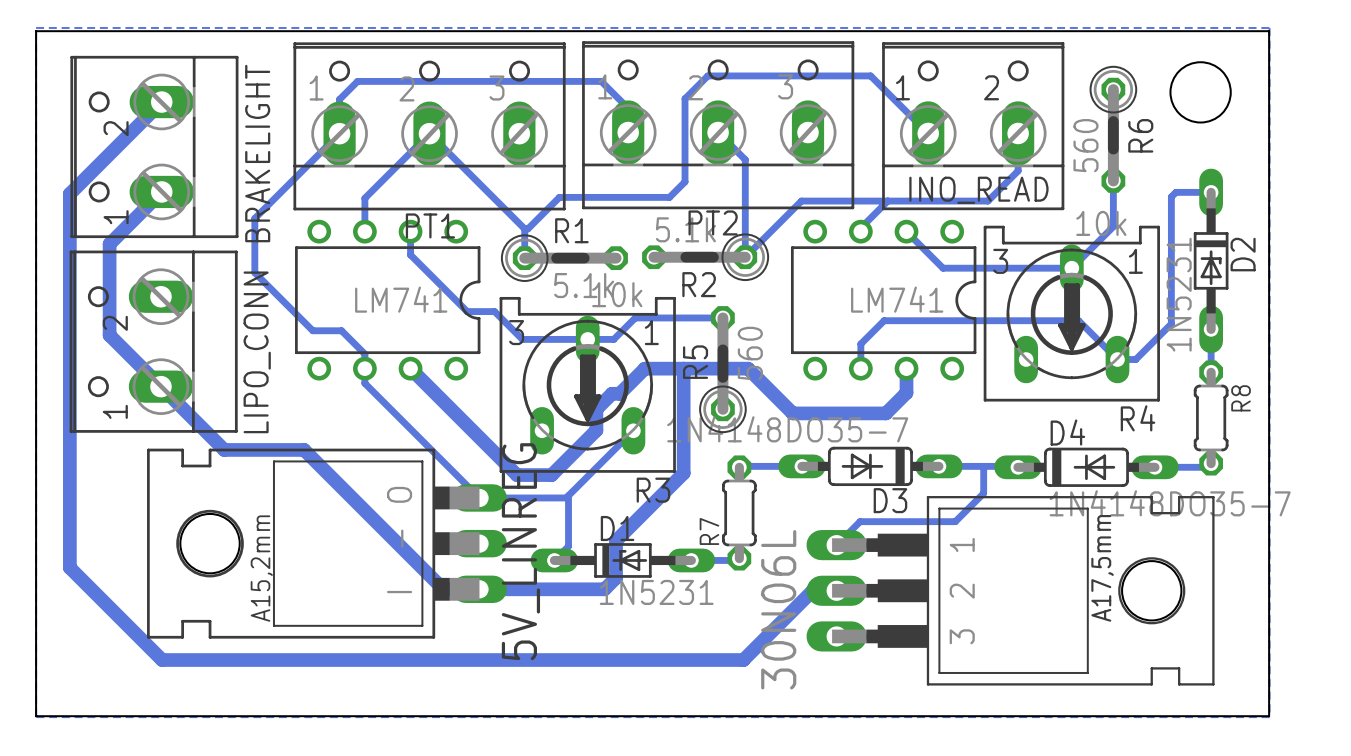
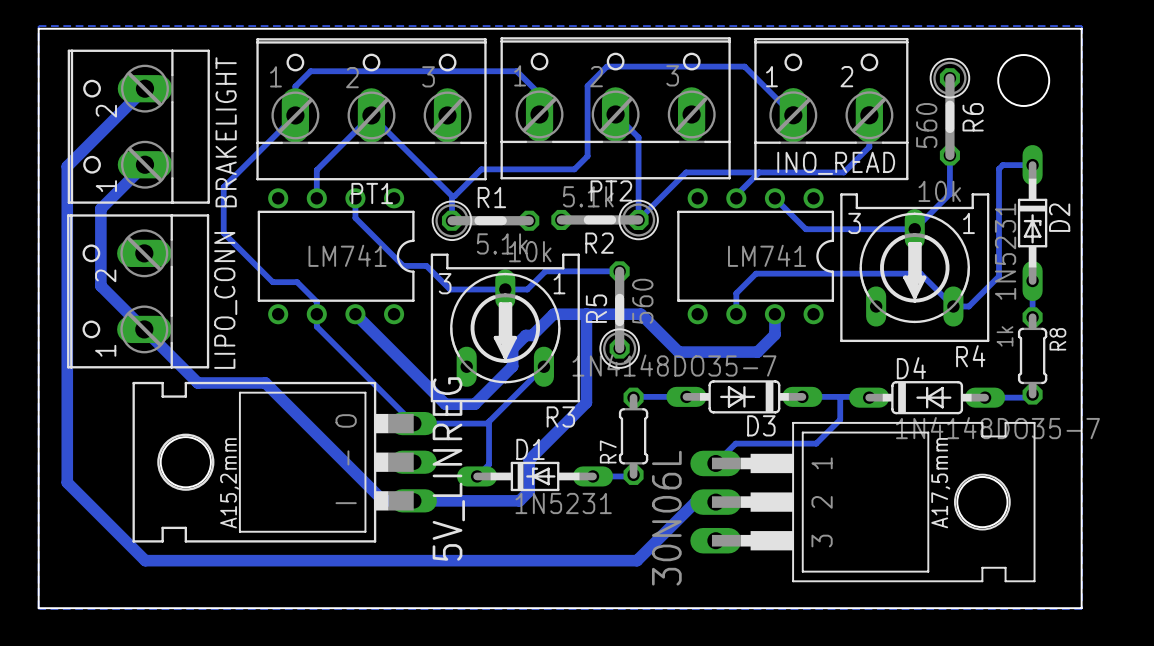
R8 value: none -> 1k (1004, 336)

